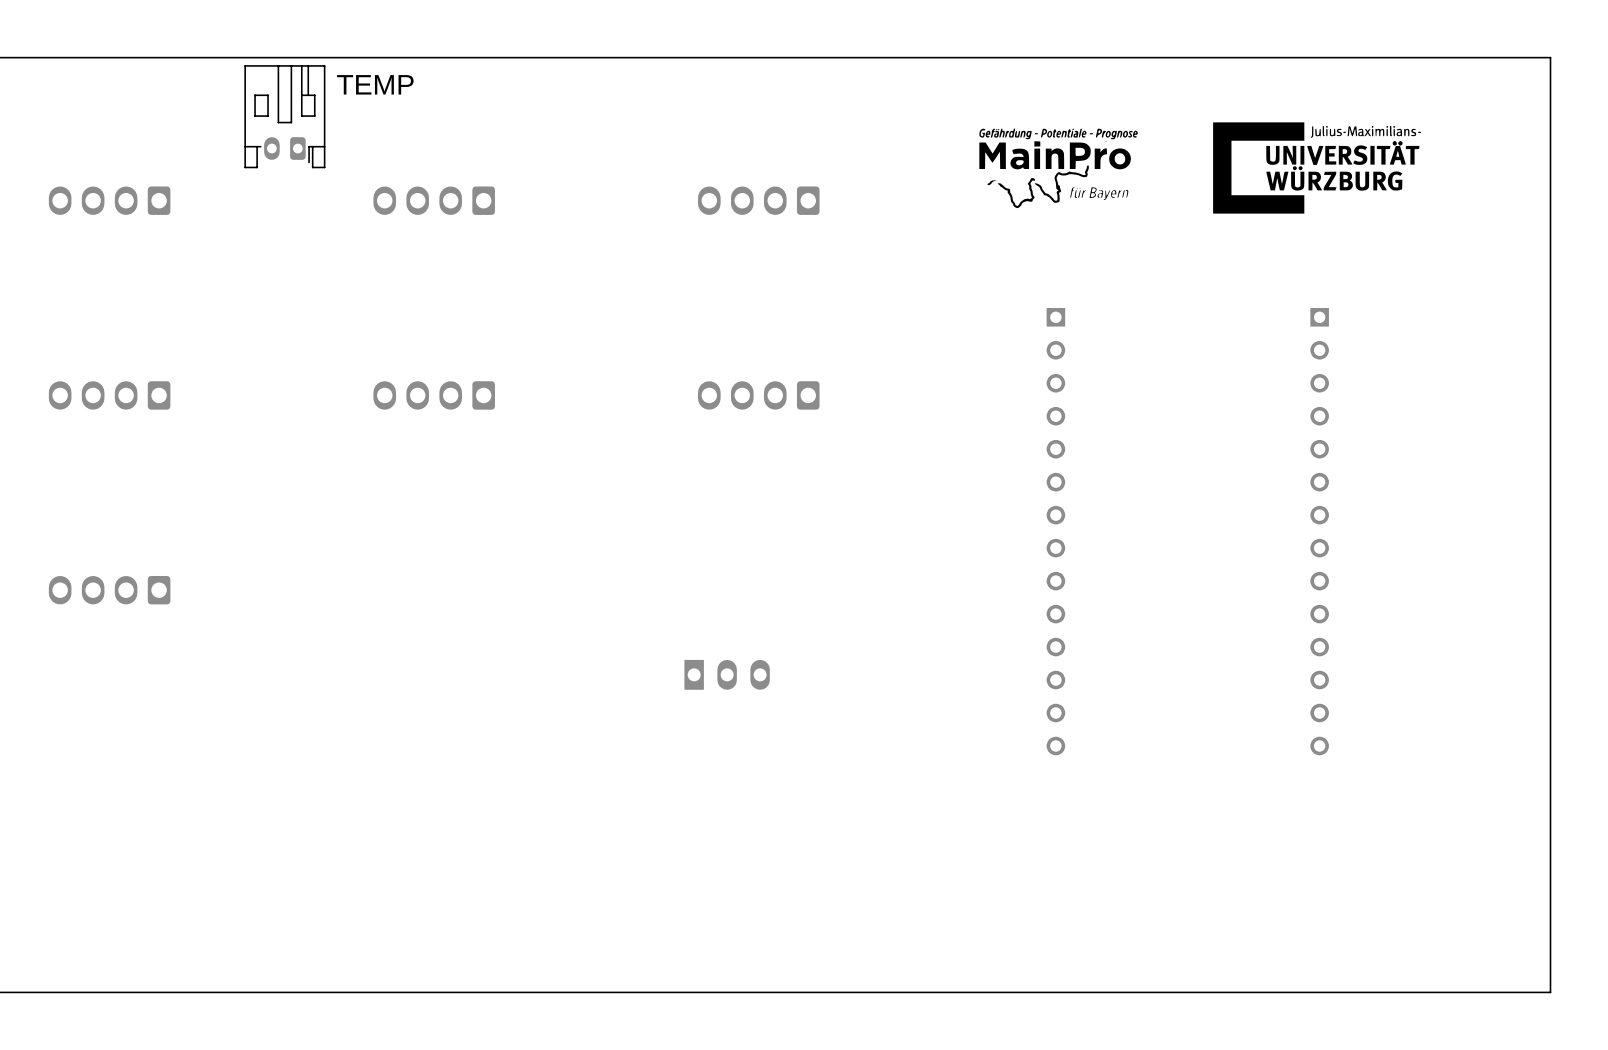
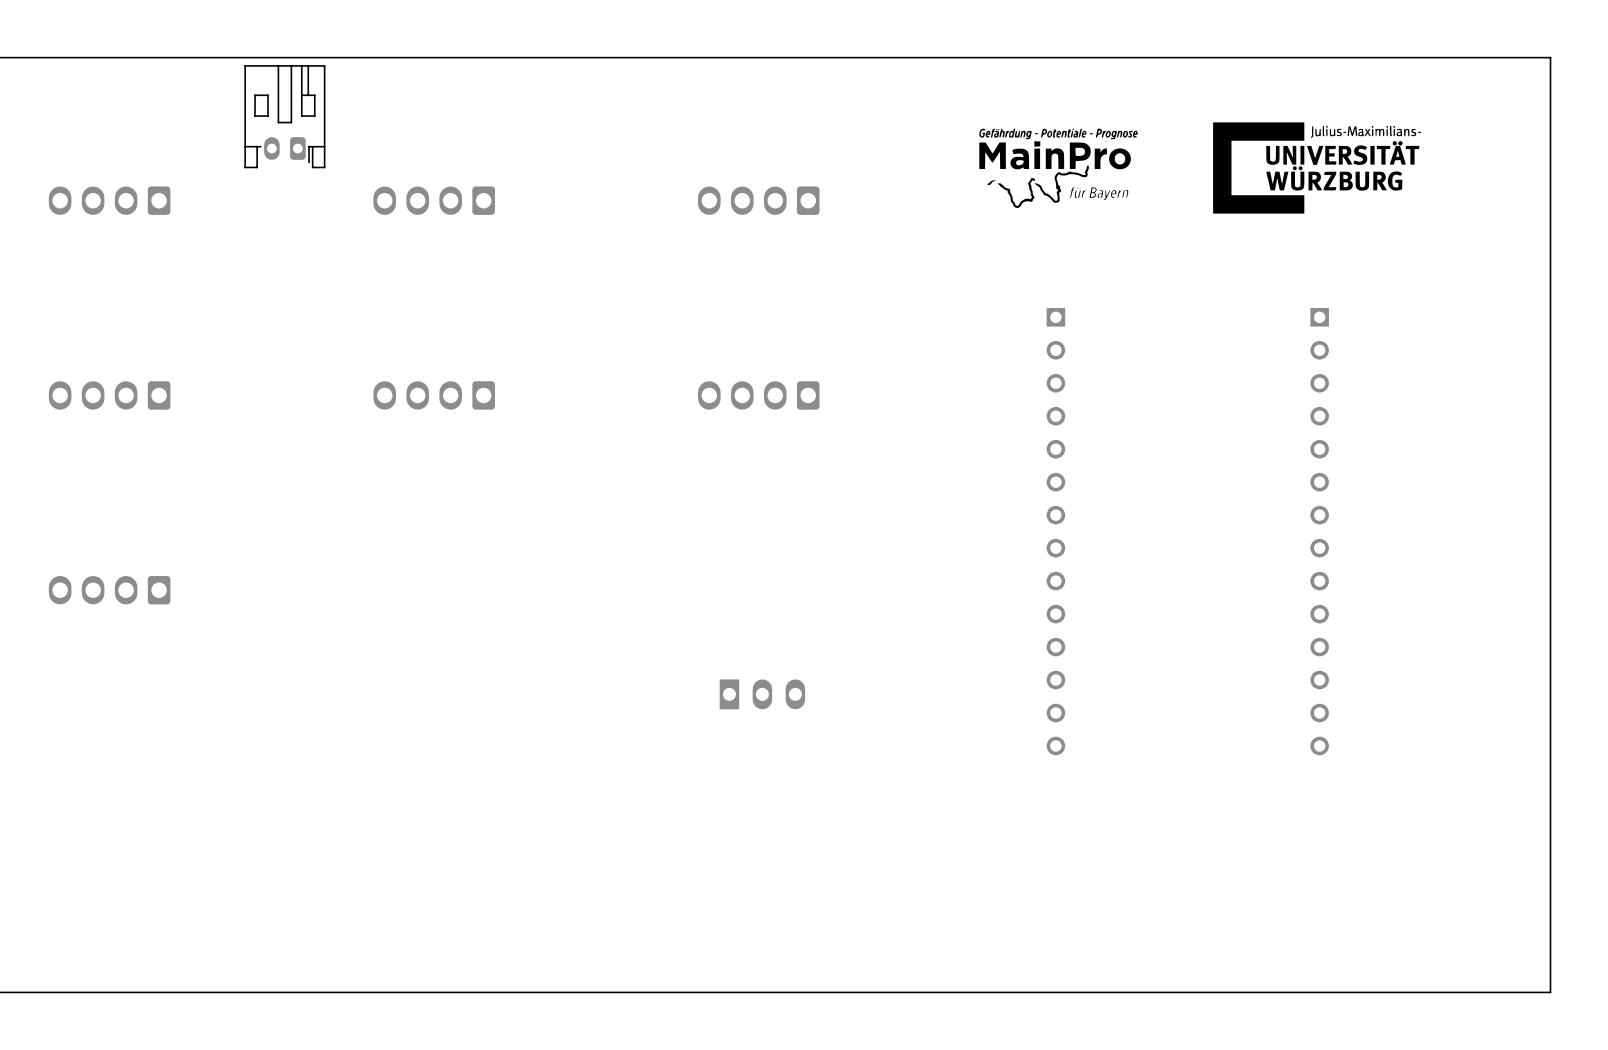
text: TEMP (375, 84) -> none
part position: (727, 674) -> (762, 694)

